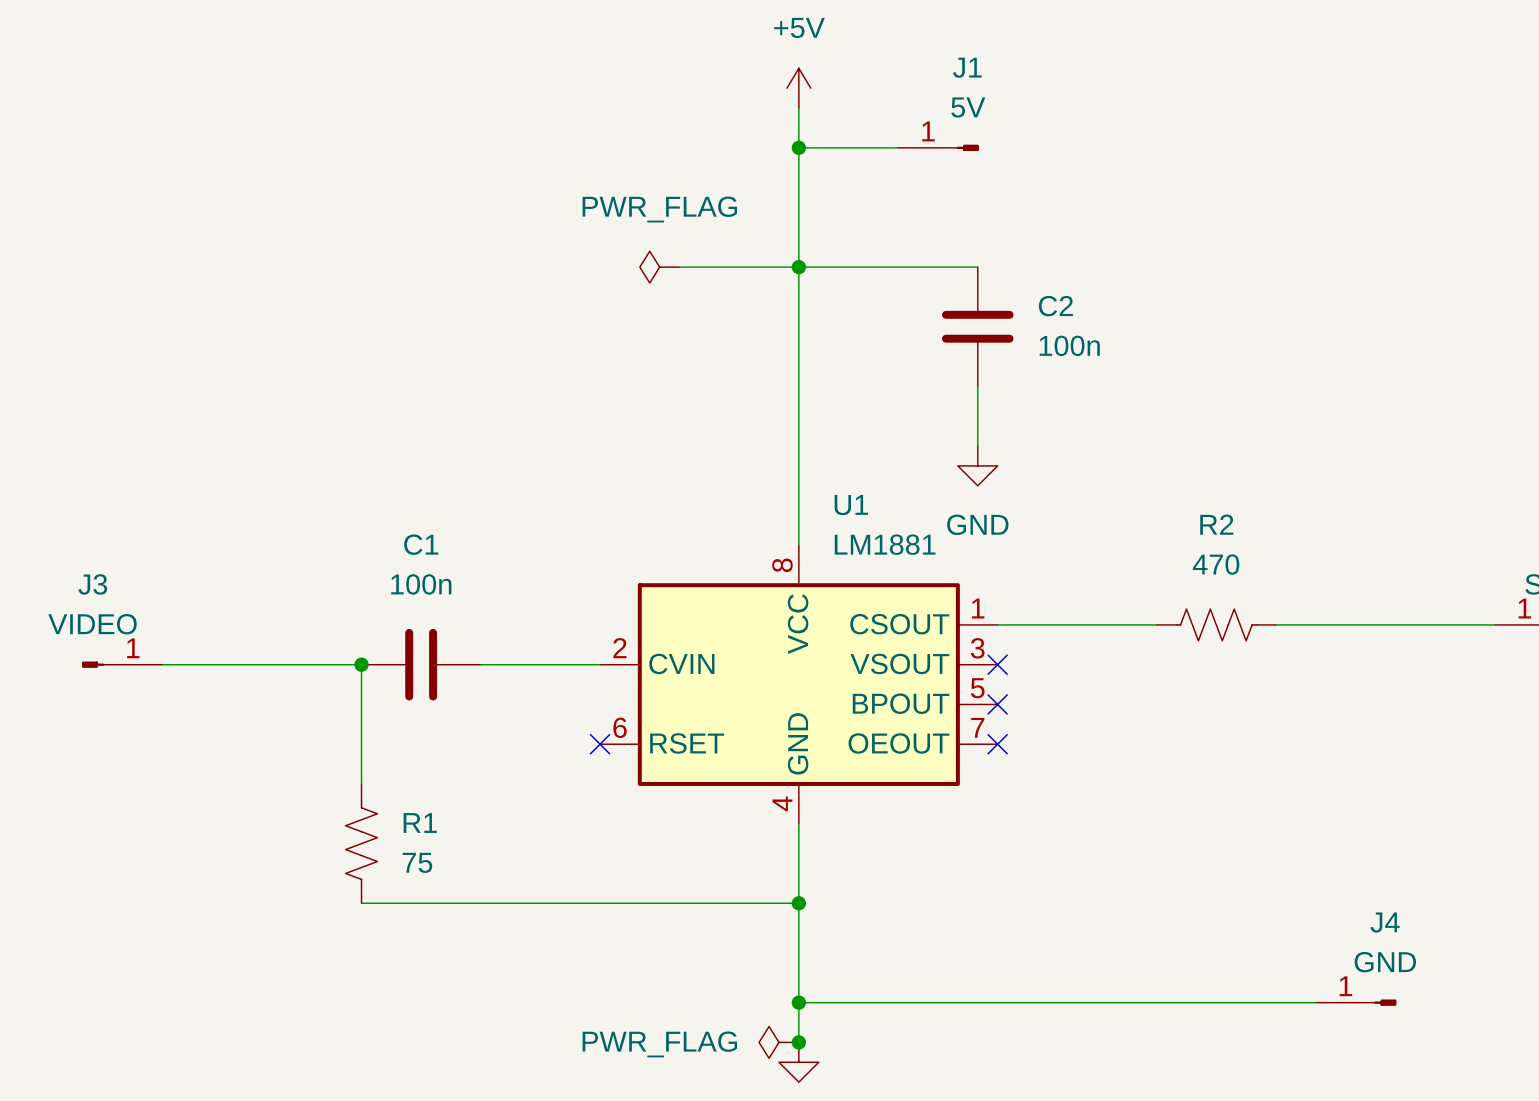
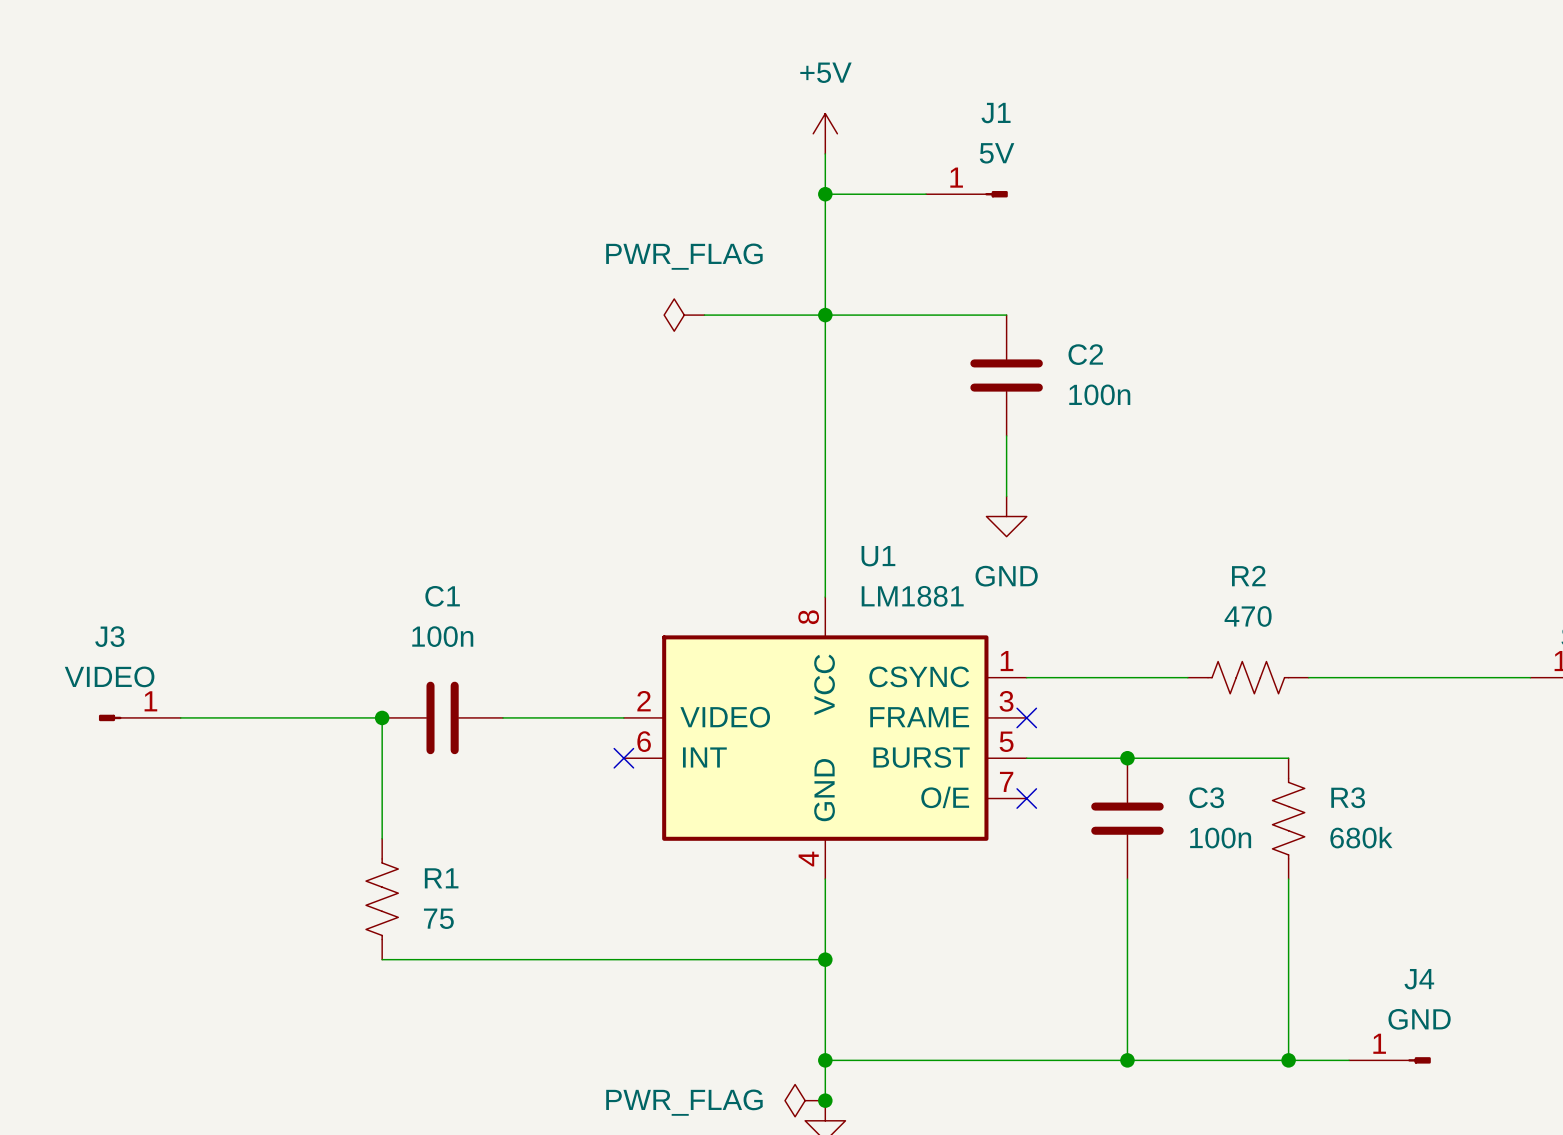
U1 symbol: [600, 545, 998, 824] -> [623, 597, 1027, 880]
wire: none -> (1026, 758) (1288, 758)
no-connect mark: (997, 704) -> none
junction: none -> (1127, 758)
no-connect mark position: (600, 744) -> (623, 758)
C3: none -> 100n (1127, 818)
R3: none -> 680k (1288, 818)
wire: none -> (1127, 879) (1127, 1060)
wire: none -> (1288, 879) (1288, 1060)
junction: none -> (1127, 1060)
junction: none -> (1288, 1060)

